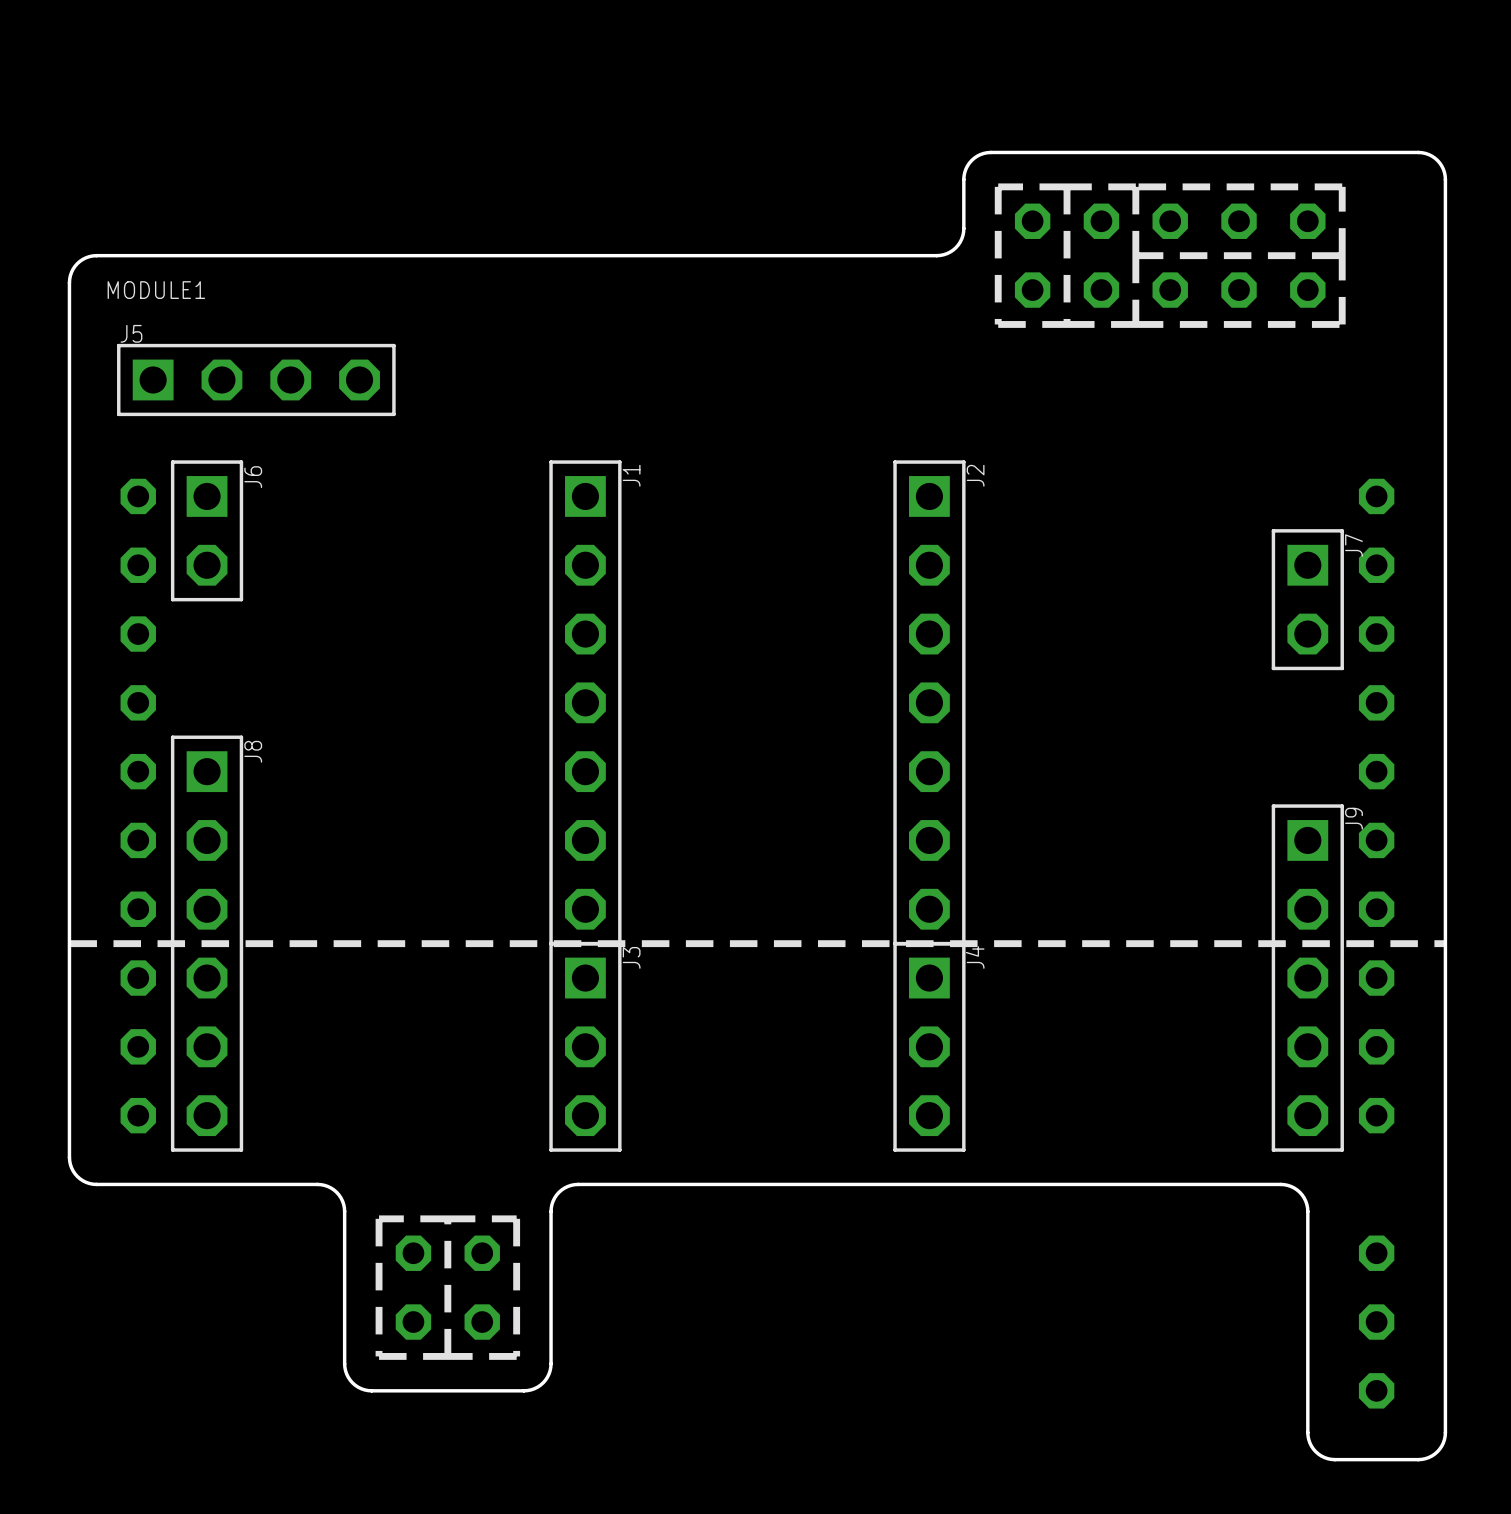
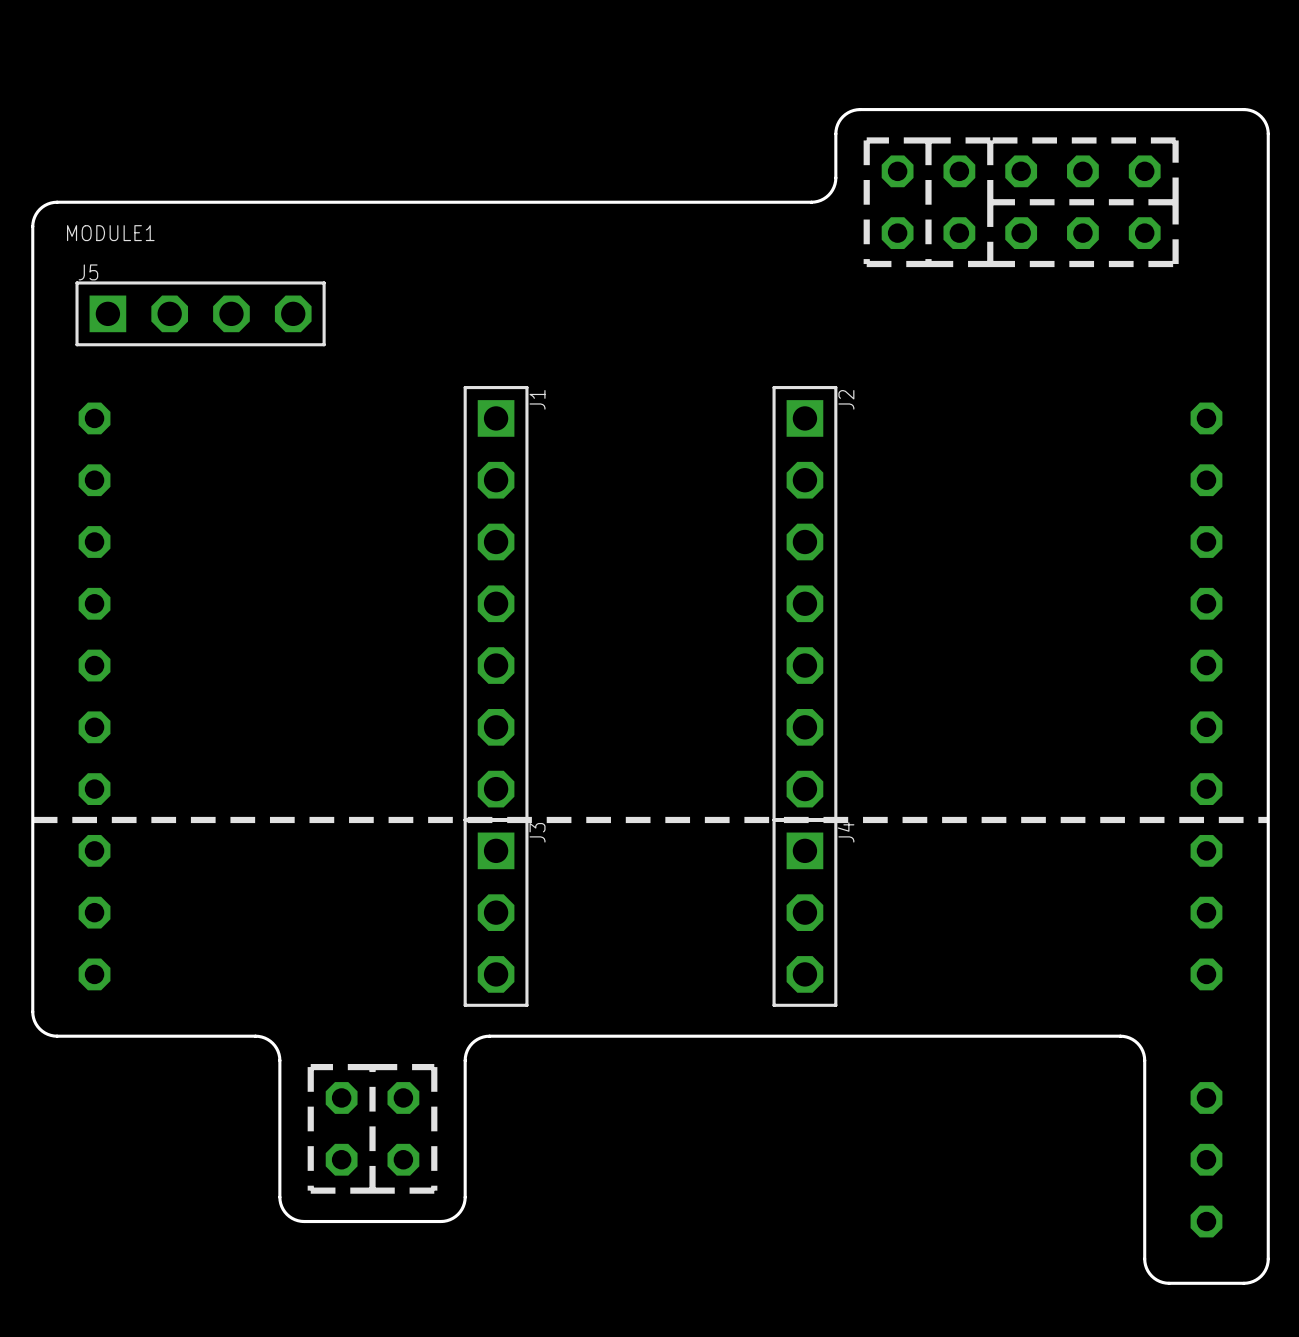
J6: (207, 530) -> none
J7: (1307, 599) -> none
J8: (207, 943) -> none
J9: (1307, 978) -> none

